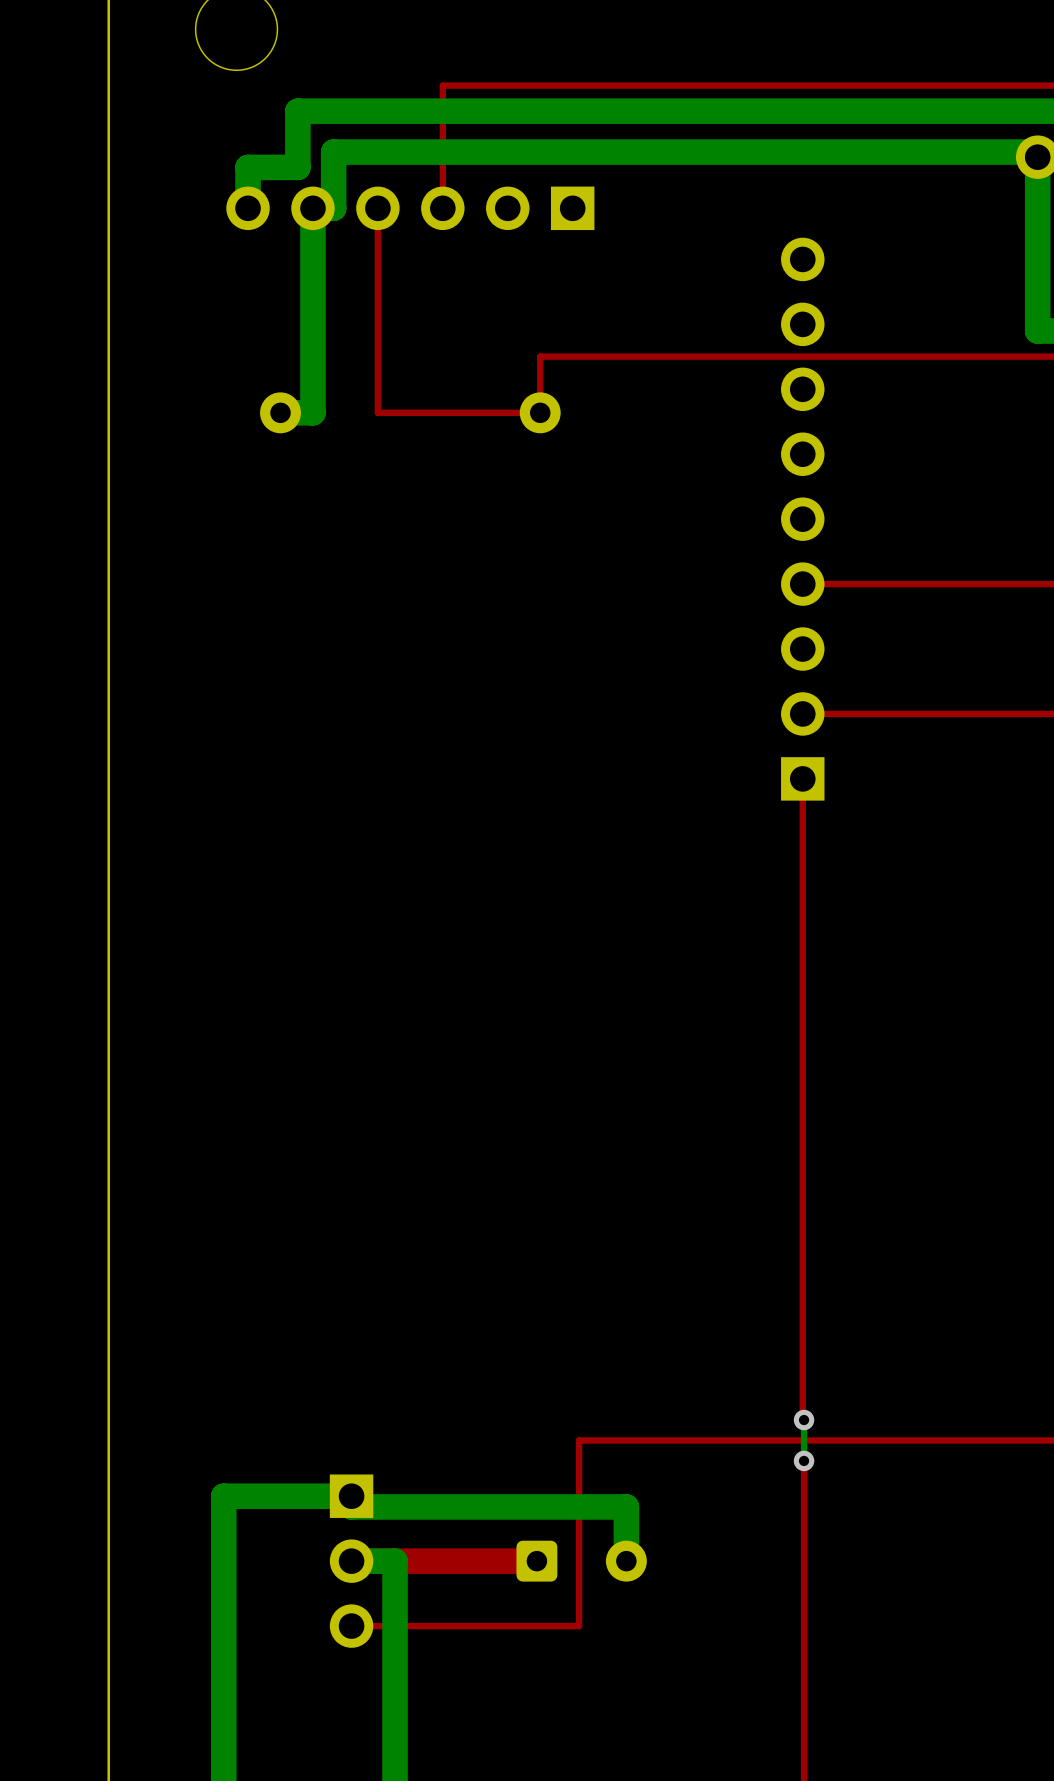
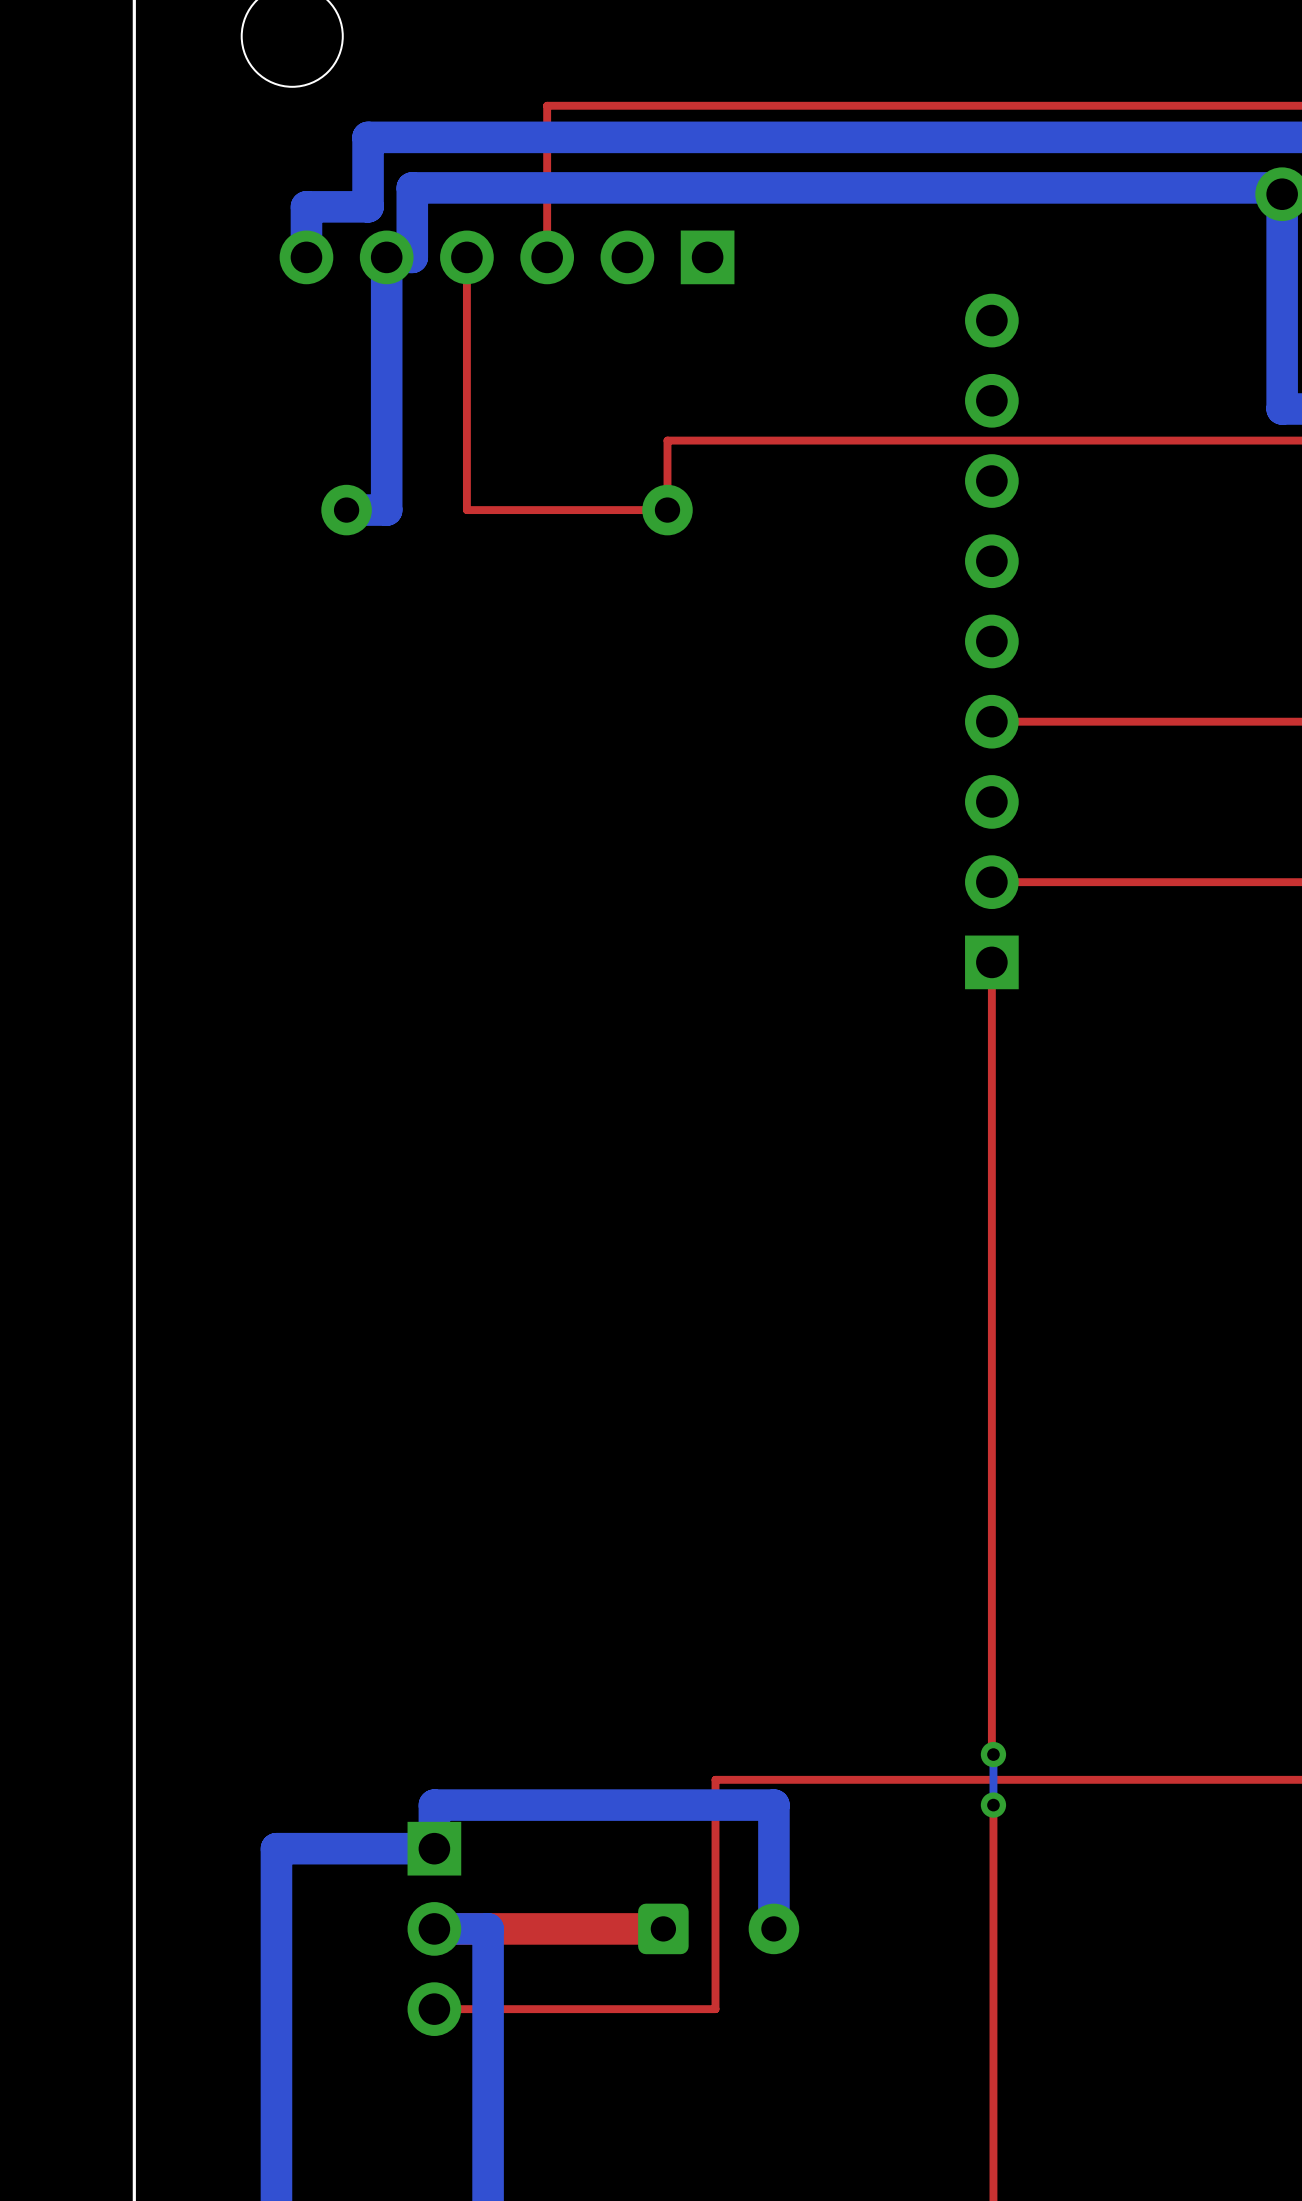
bottom track: (351, 1496) (351, 1506) (626, 1506) -> (437, 1848) (434, 1848) (434, 1805) (773, 1805) (773, 1861)

